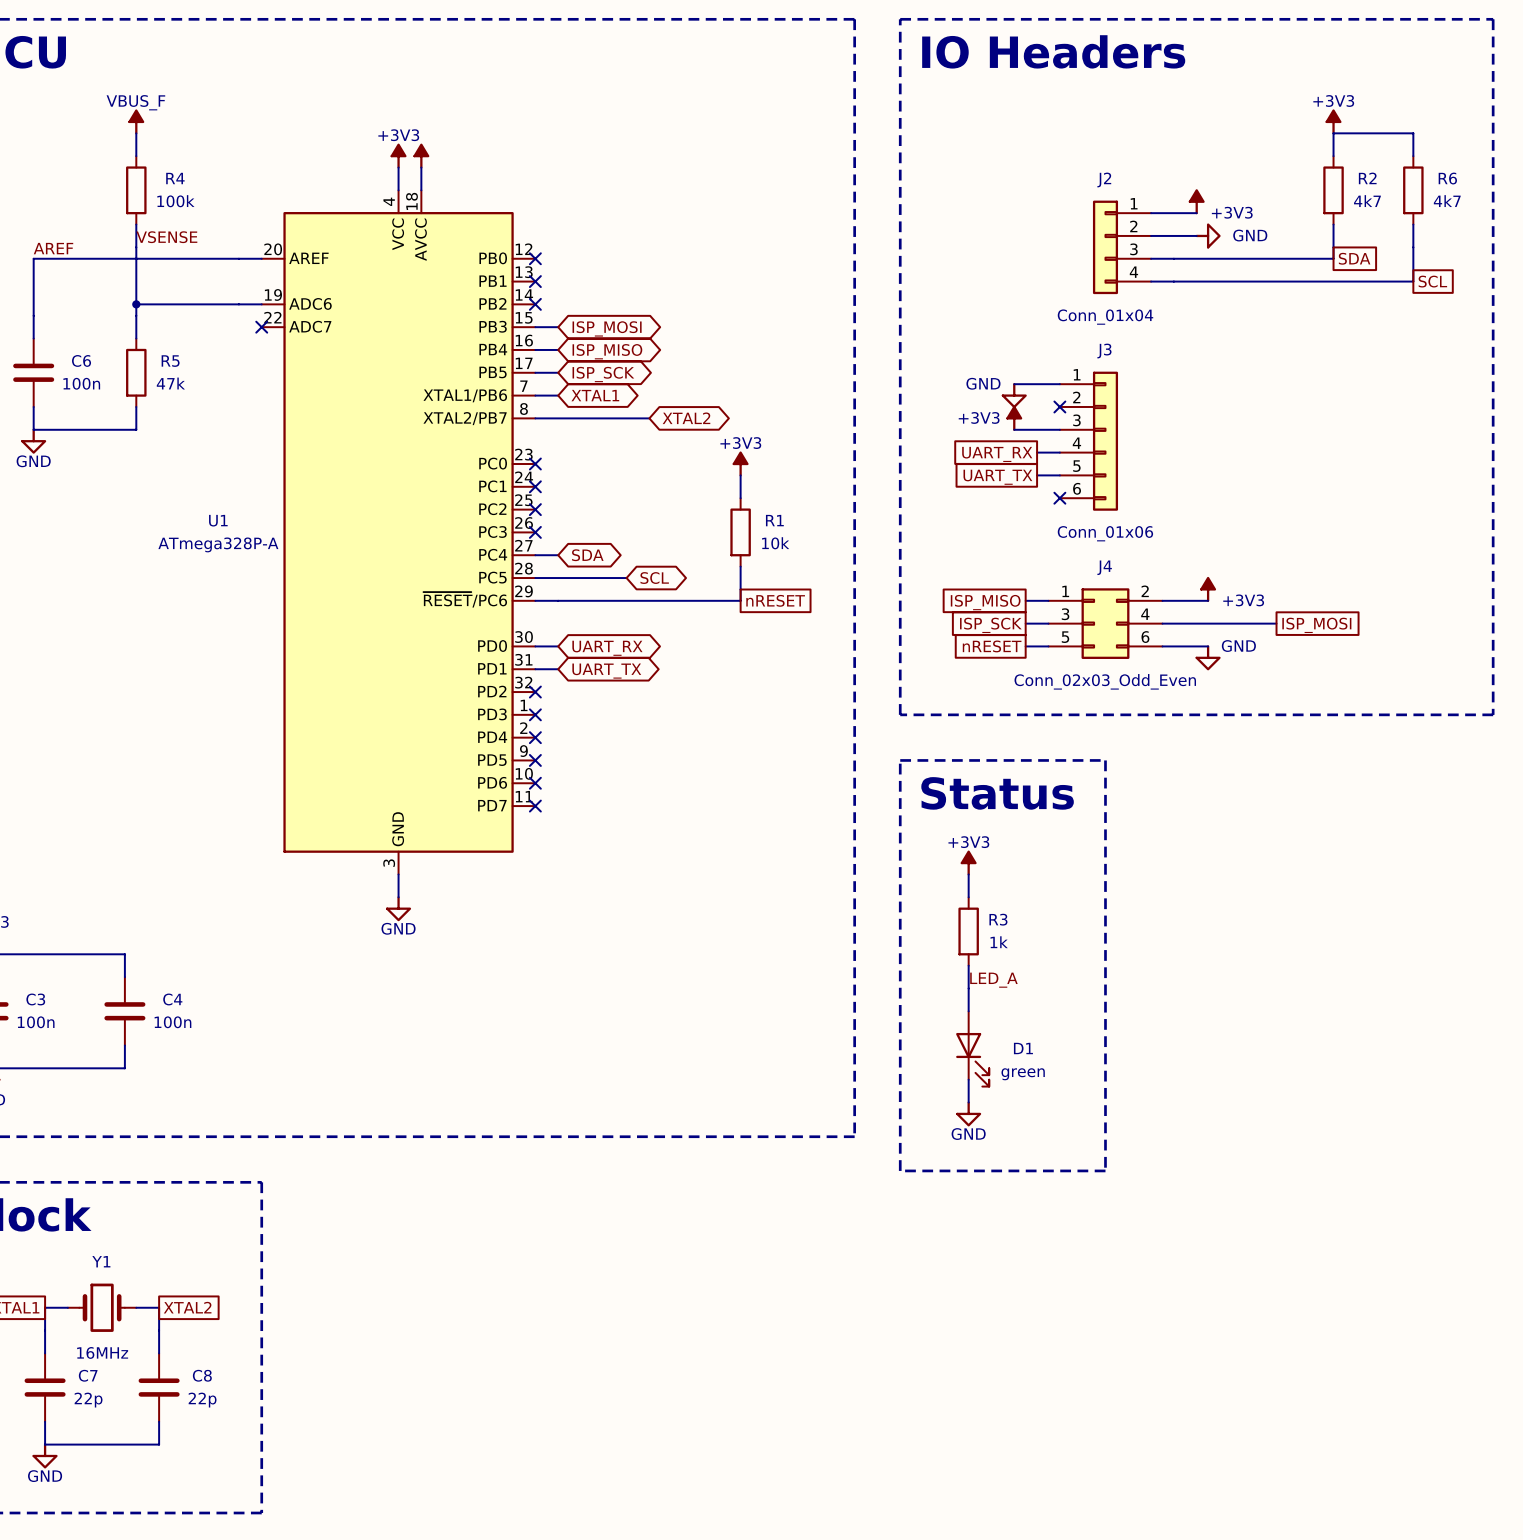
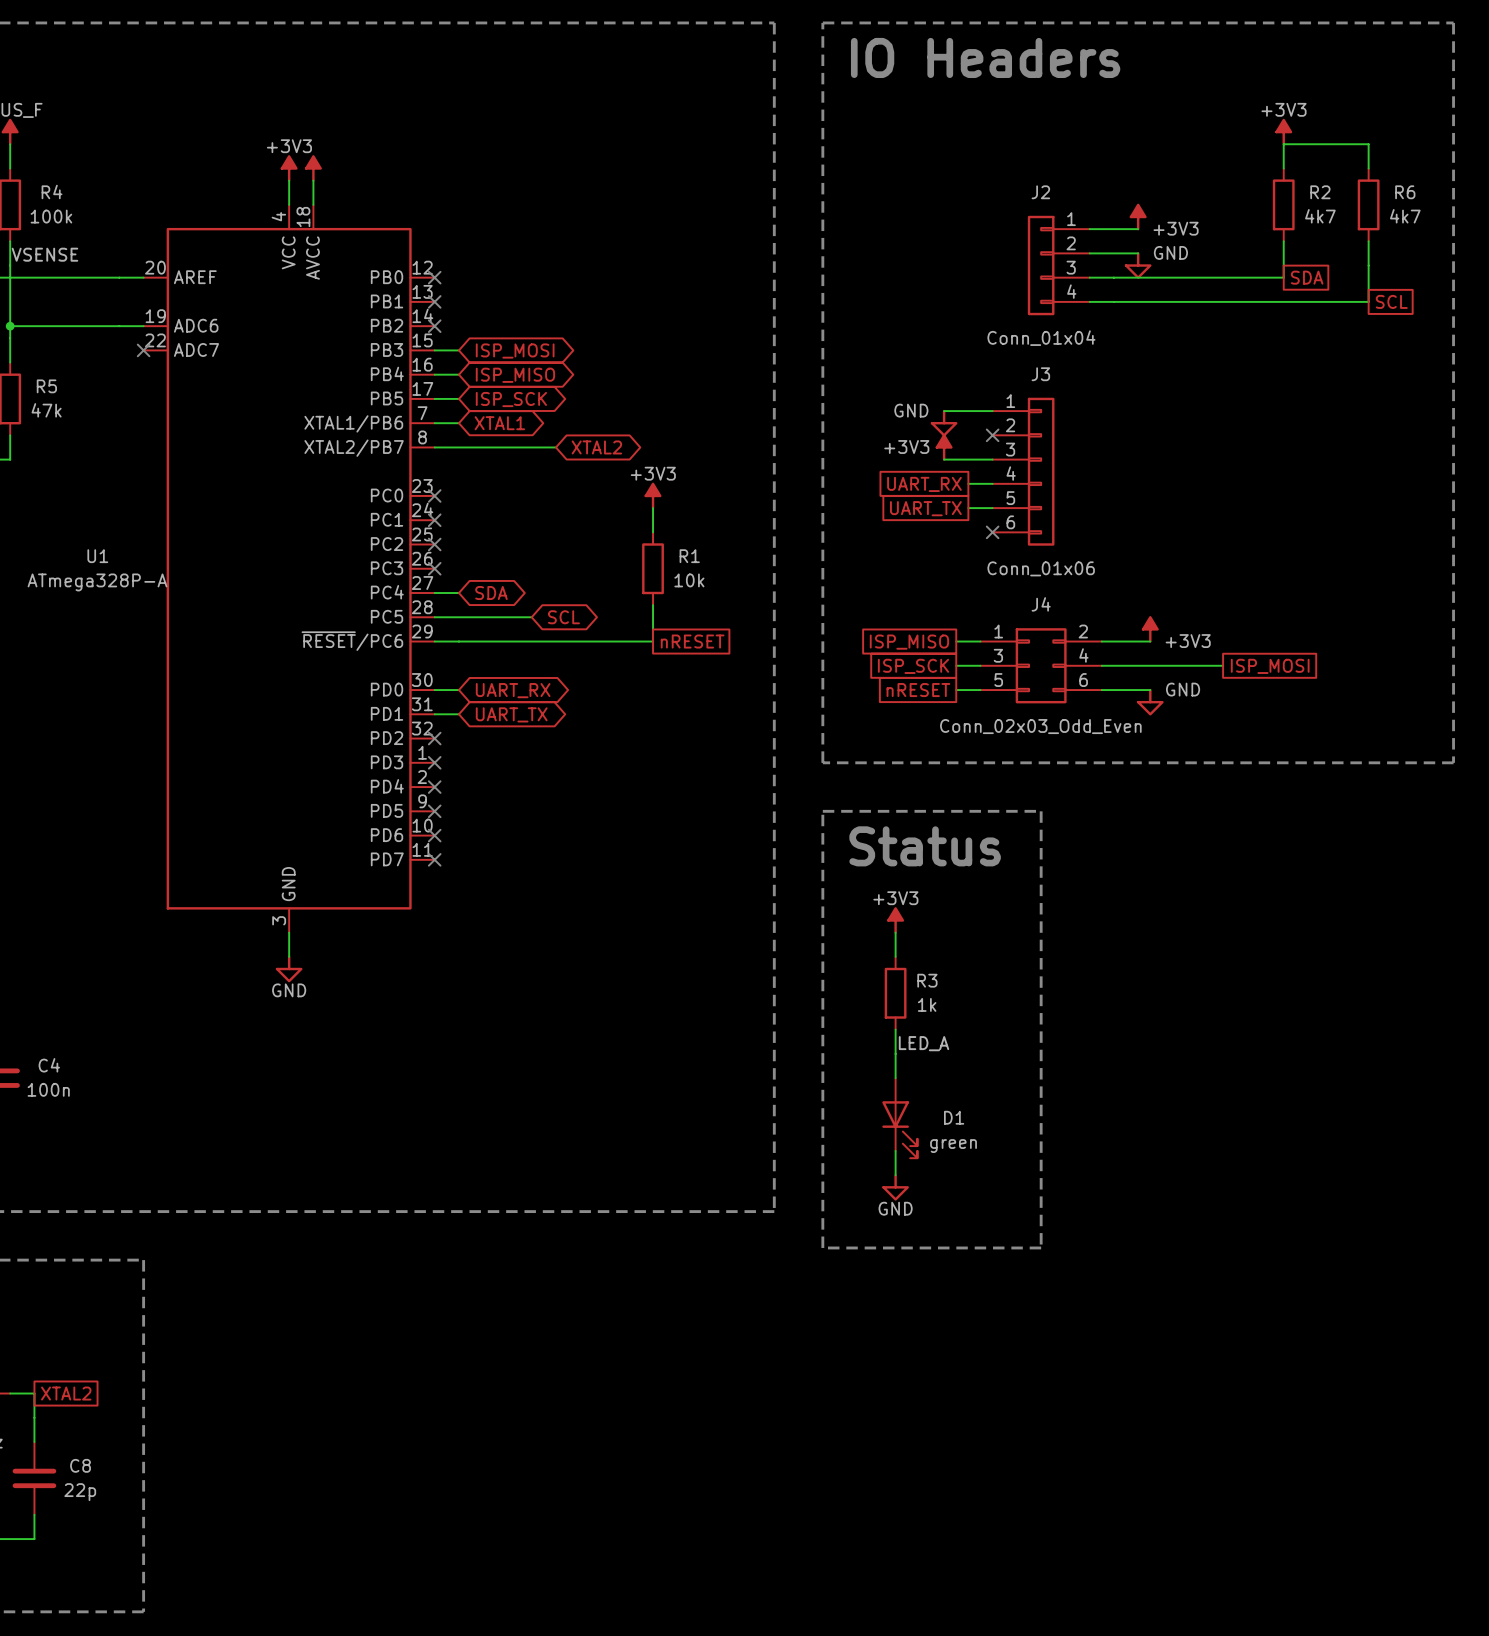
power symbol rotation: 0° (1208, 235) -> 90° clockwise (1138, 265)
power symbol position: GND (1208, 235) -> GND (1138, 265)

